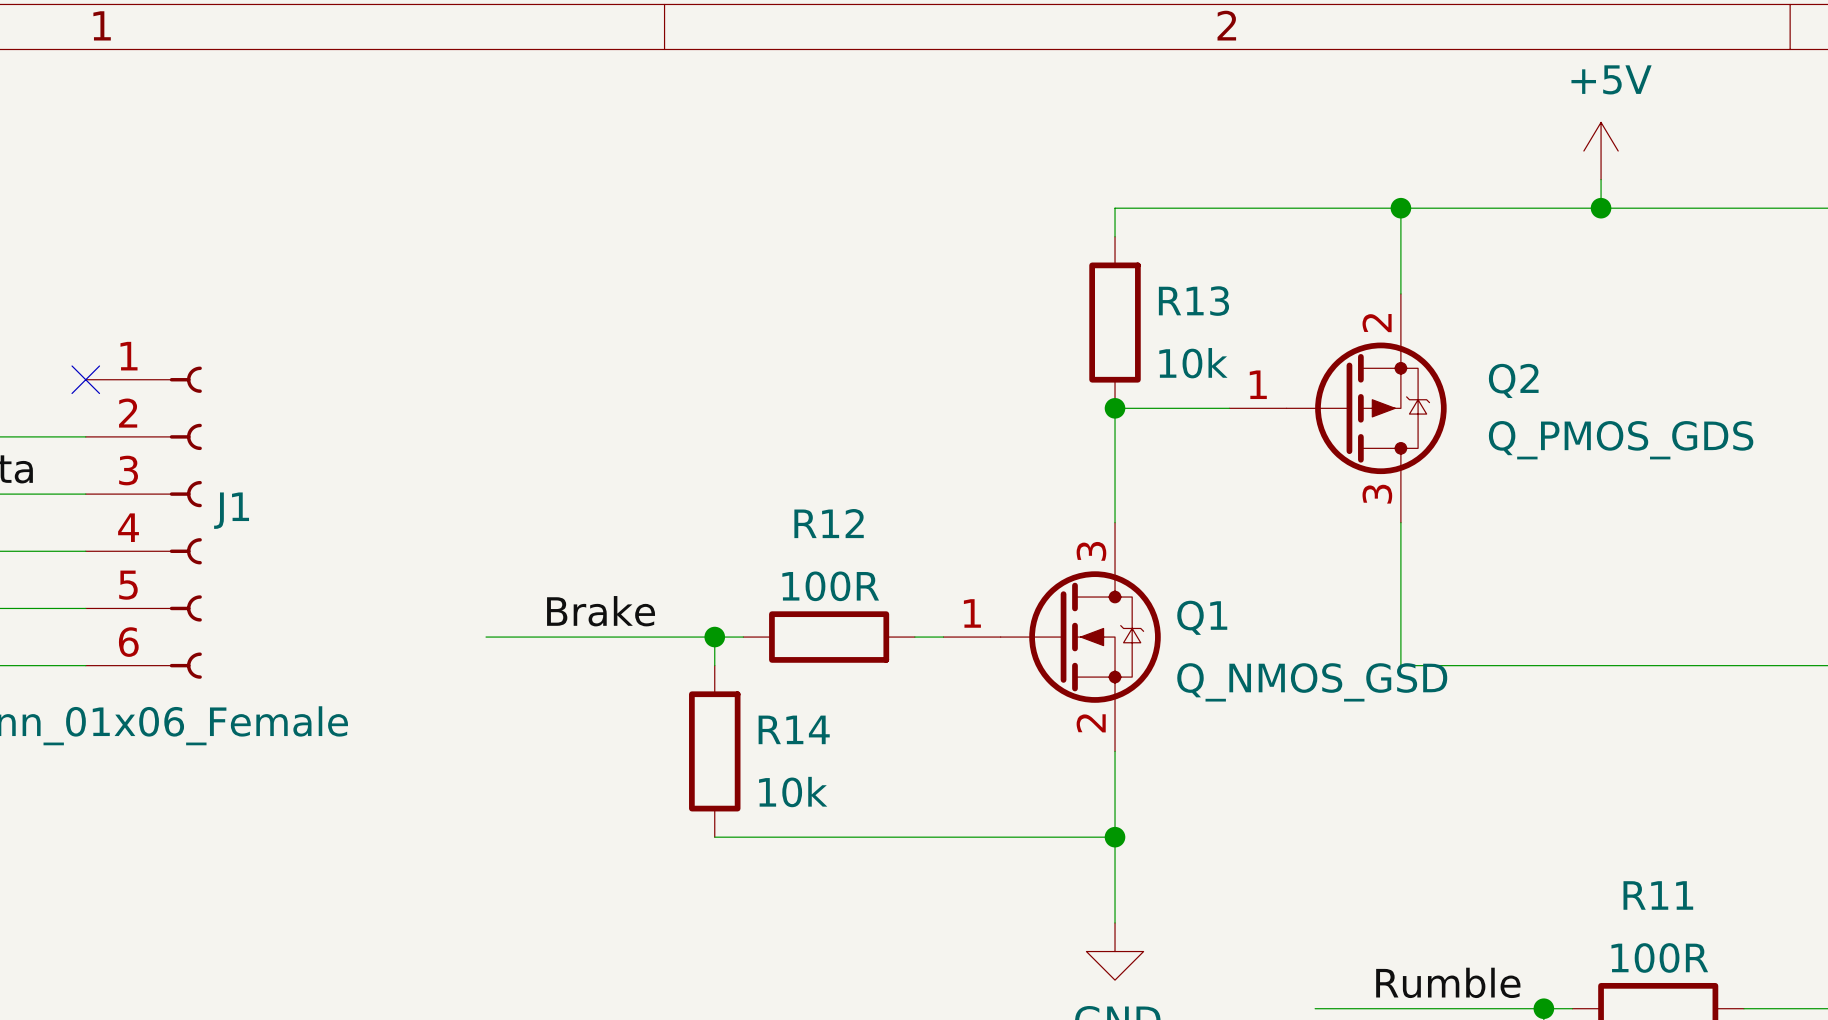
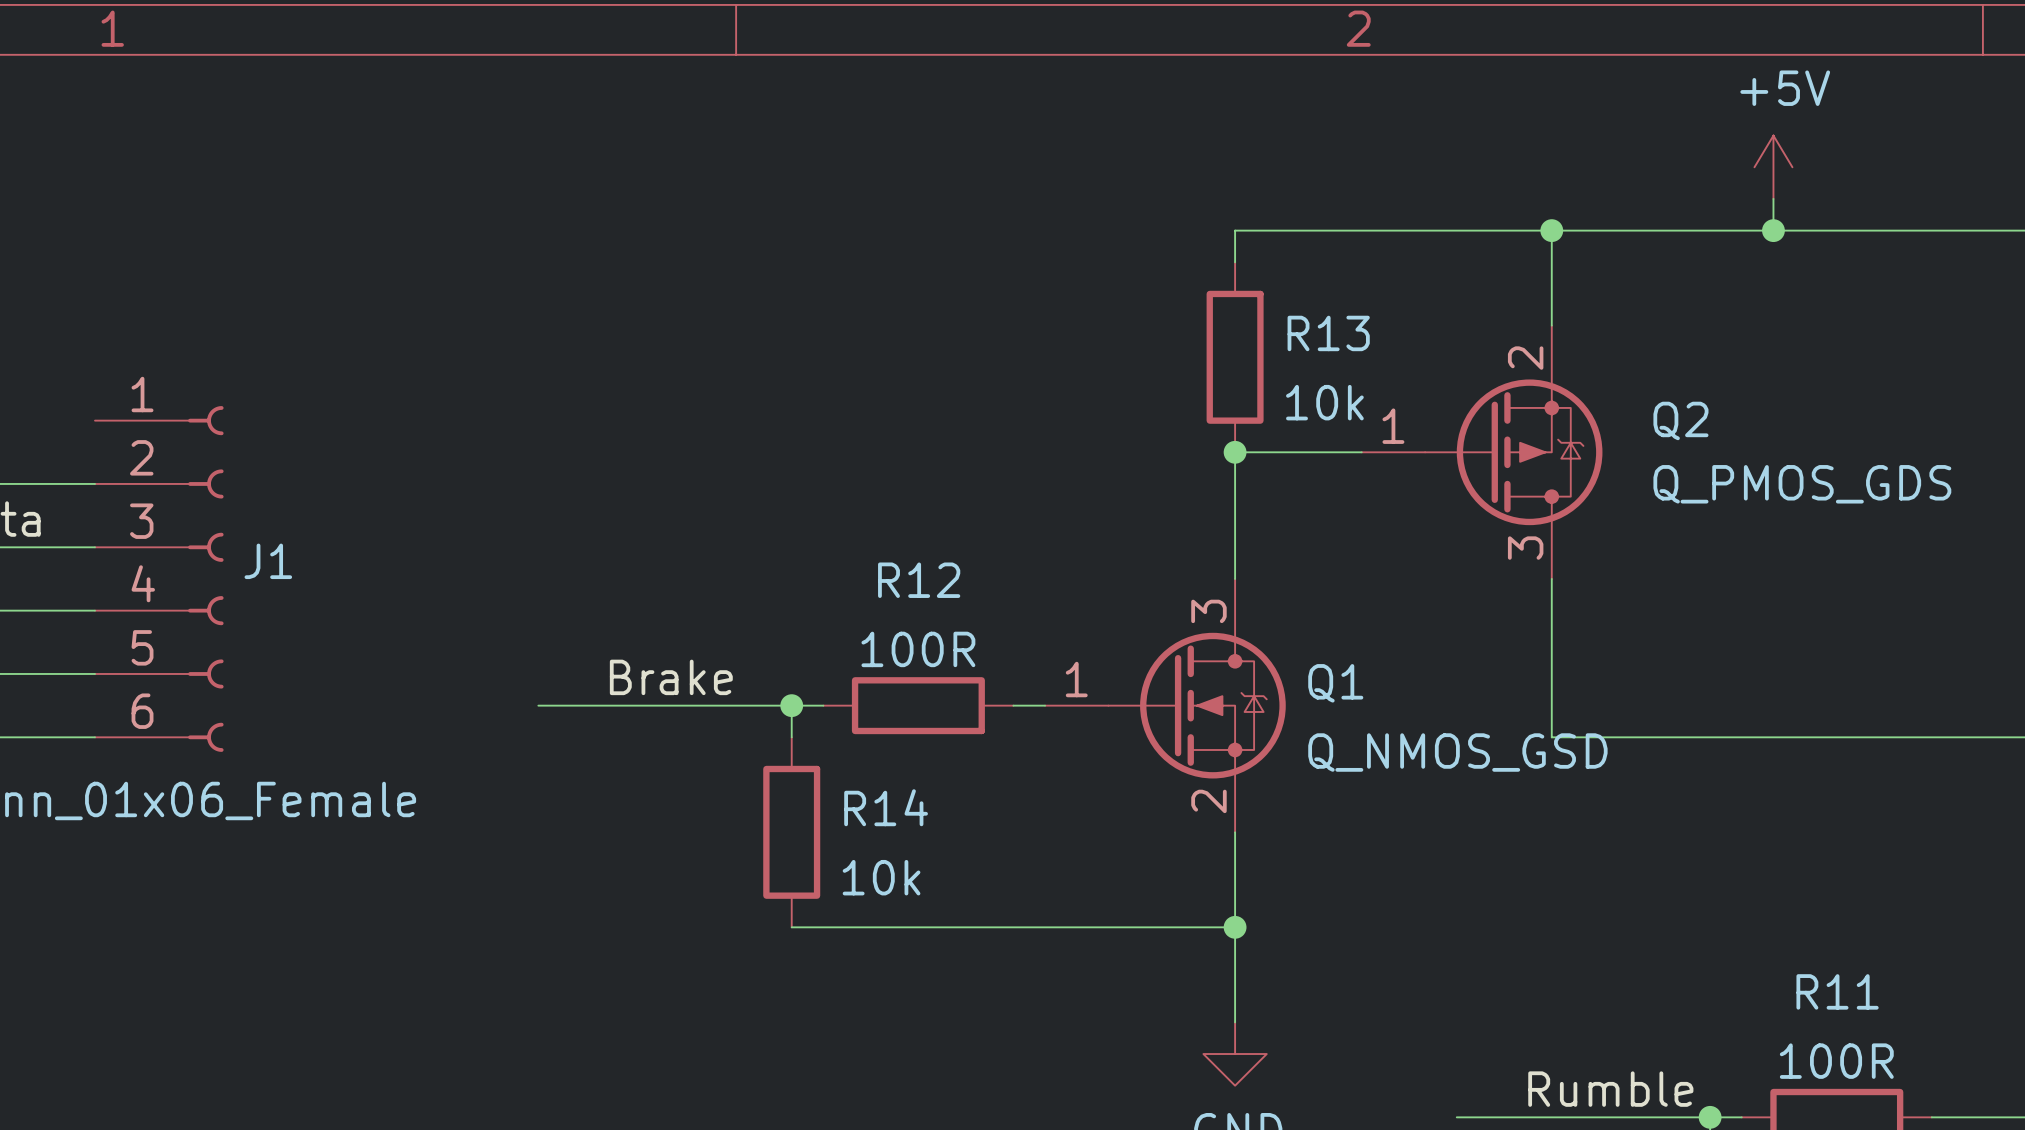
no-connect mark: (85, 379) -> none

